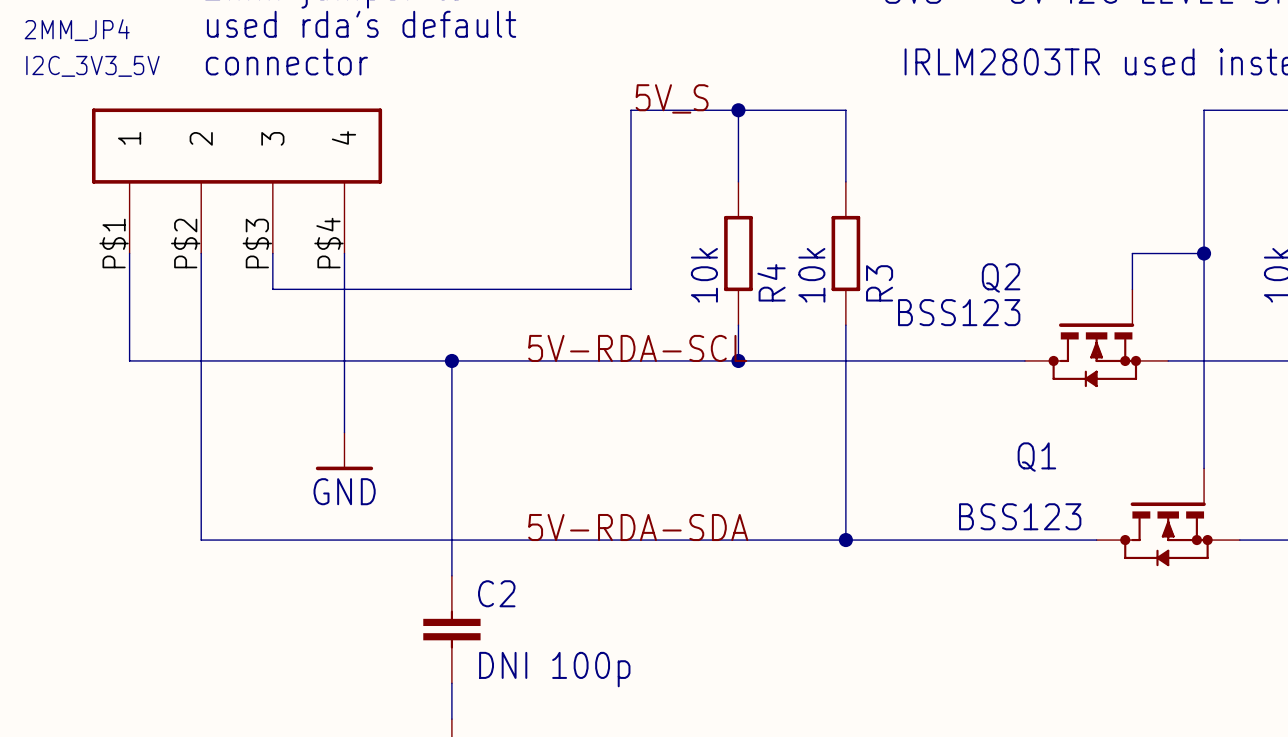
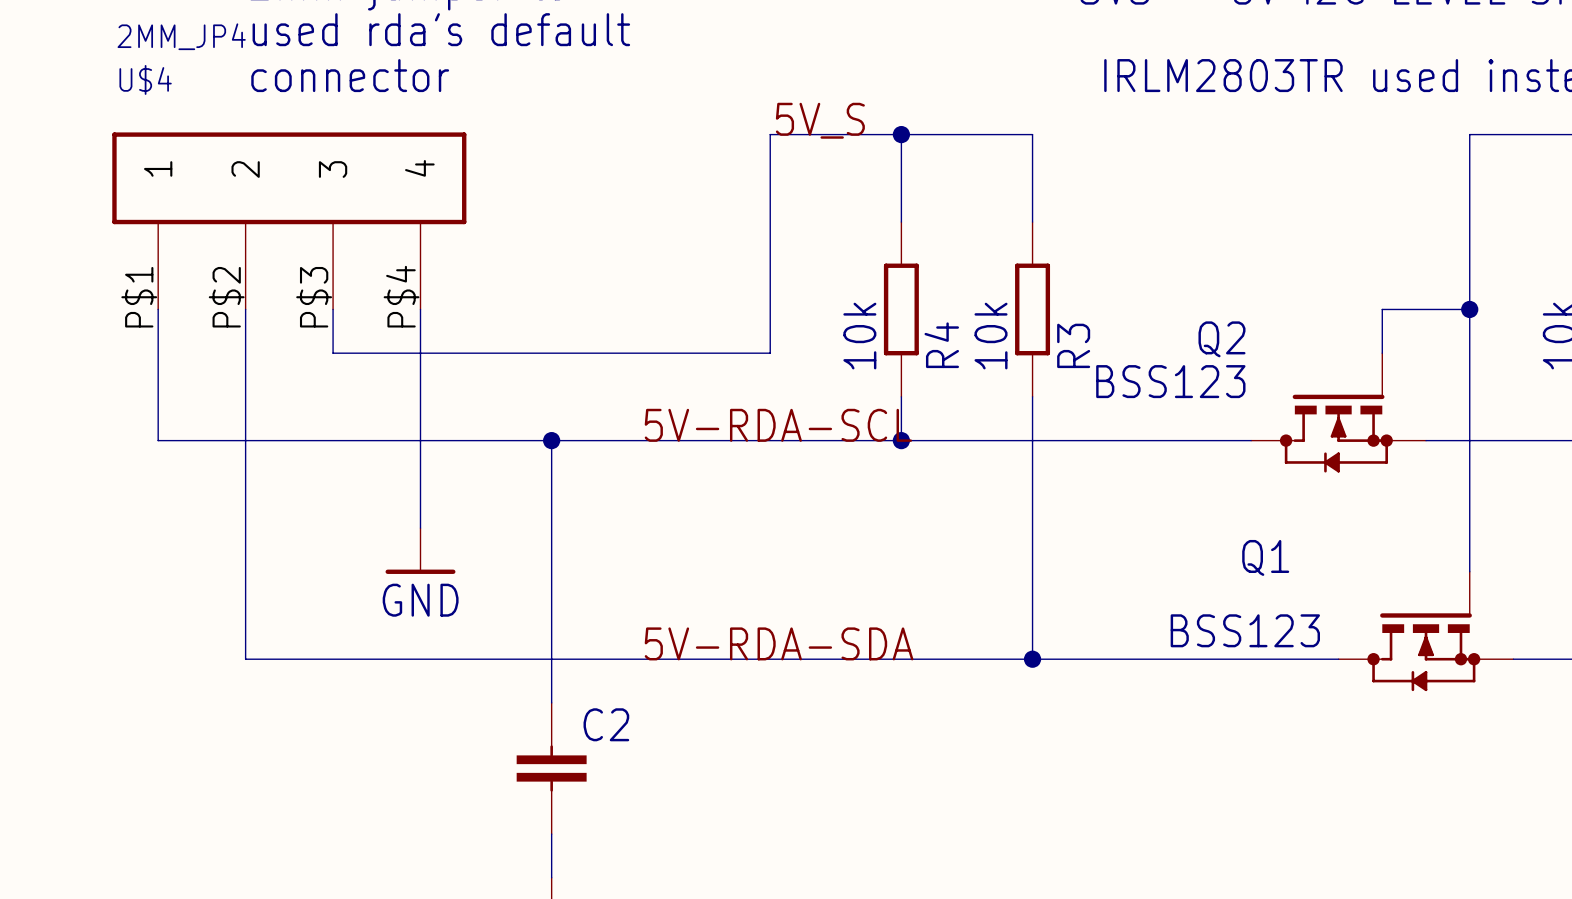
I2C_3V3_5V value position: 2MM_JP4 (77, 30) -> 2MM_JP4 (181, 36)
I2C_3V3_5V name: I2C_3V3_5V (92, 66) -> U$4 (145, 79)
C2 value: DNI 100p (554, 669) -> none

